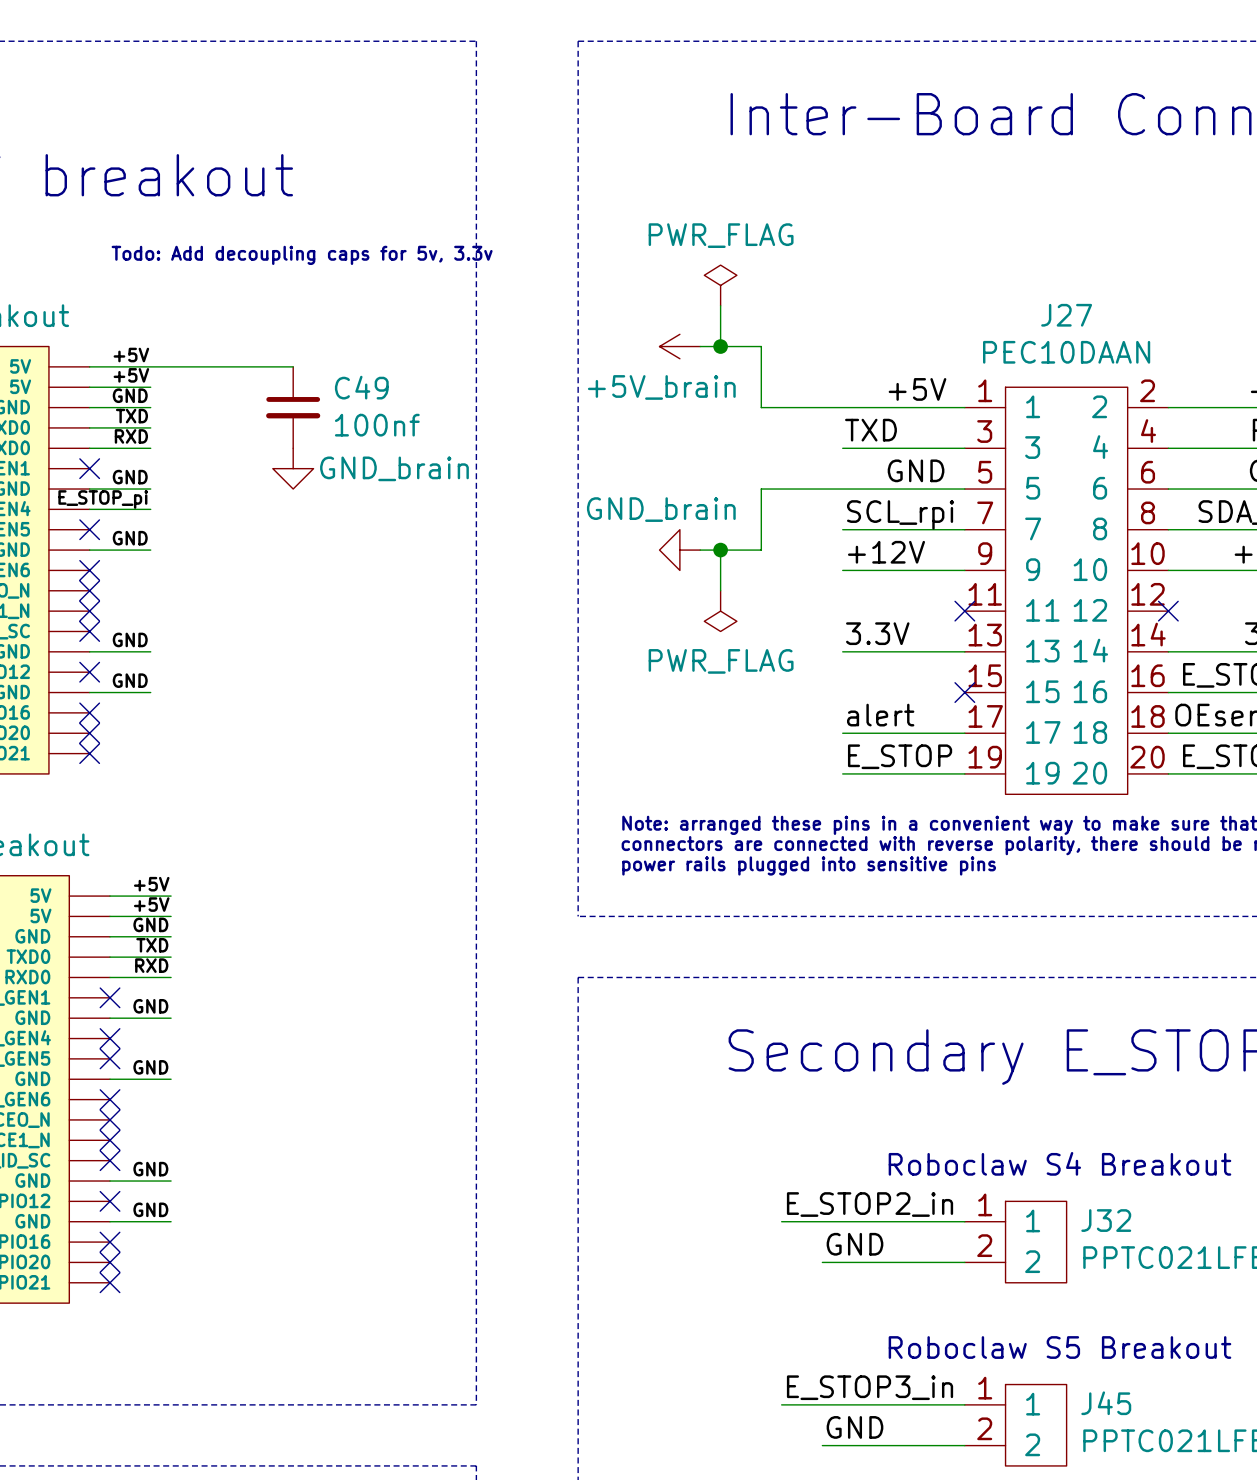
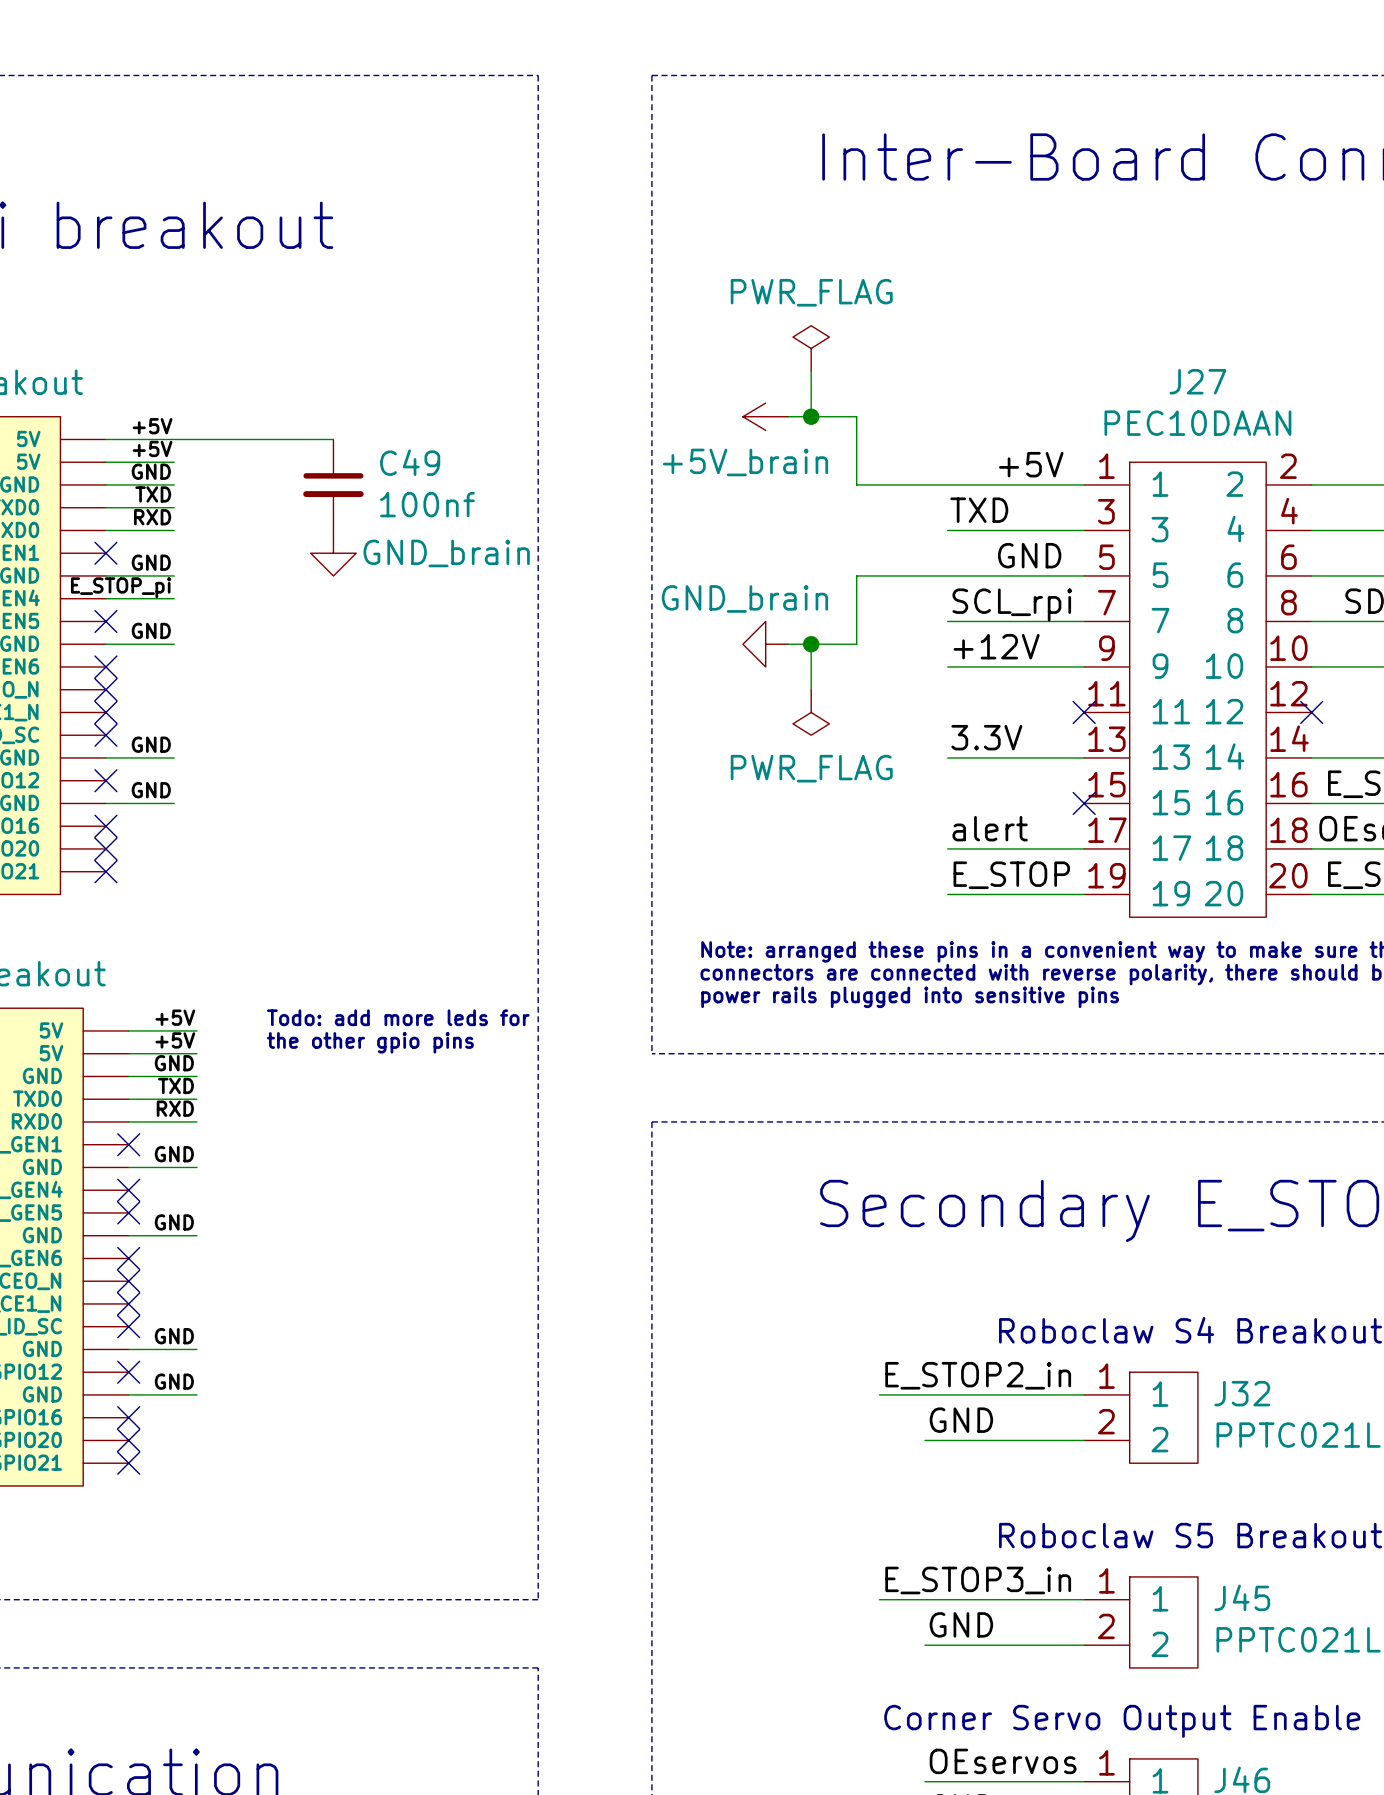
text: Todo: Add decoupling caps for 5v, 3.3v (302, 255) -> none
text: none -> Todo: add more leds for (398, 1017)
text: none -> the other gpio pins (370, 1042)

